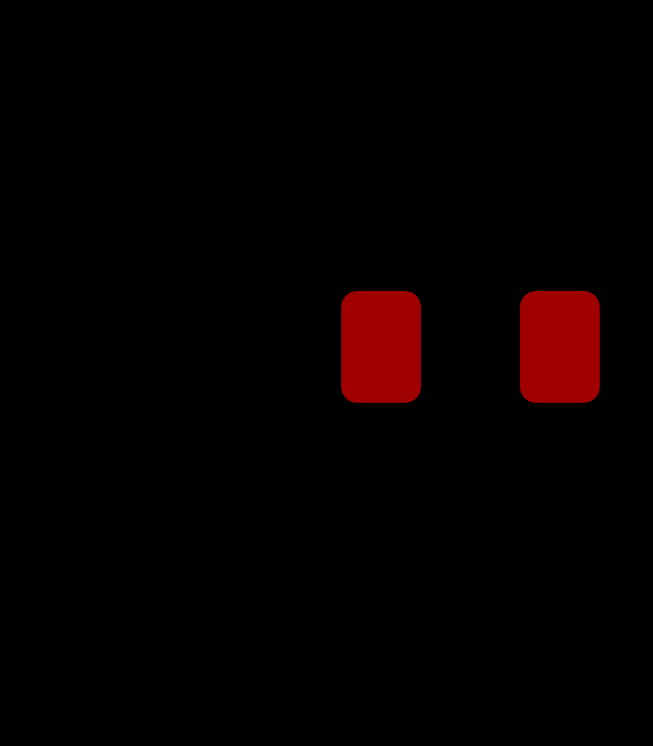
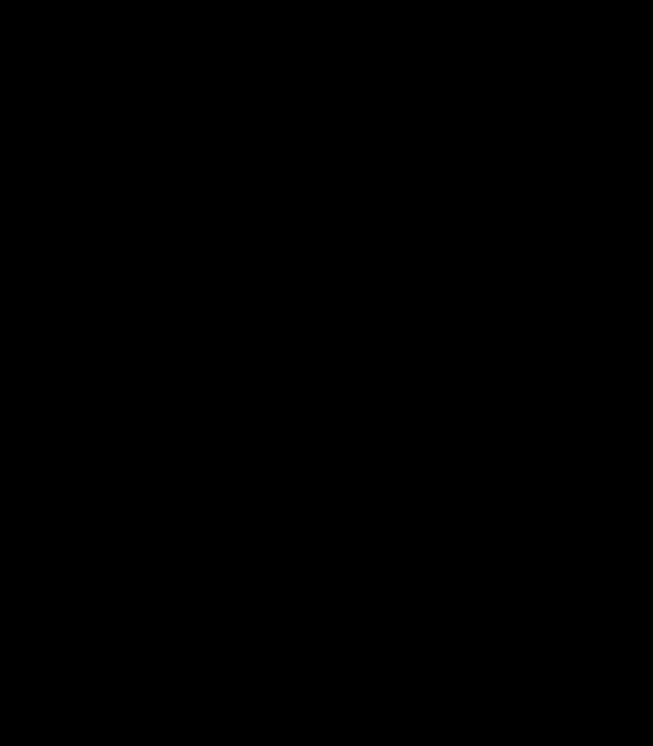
part: (470, 346) -> none

